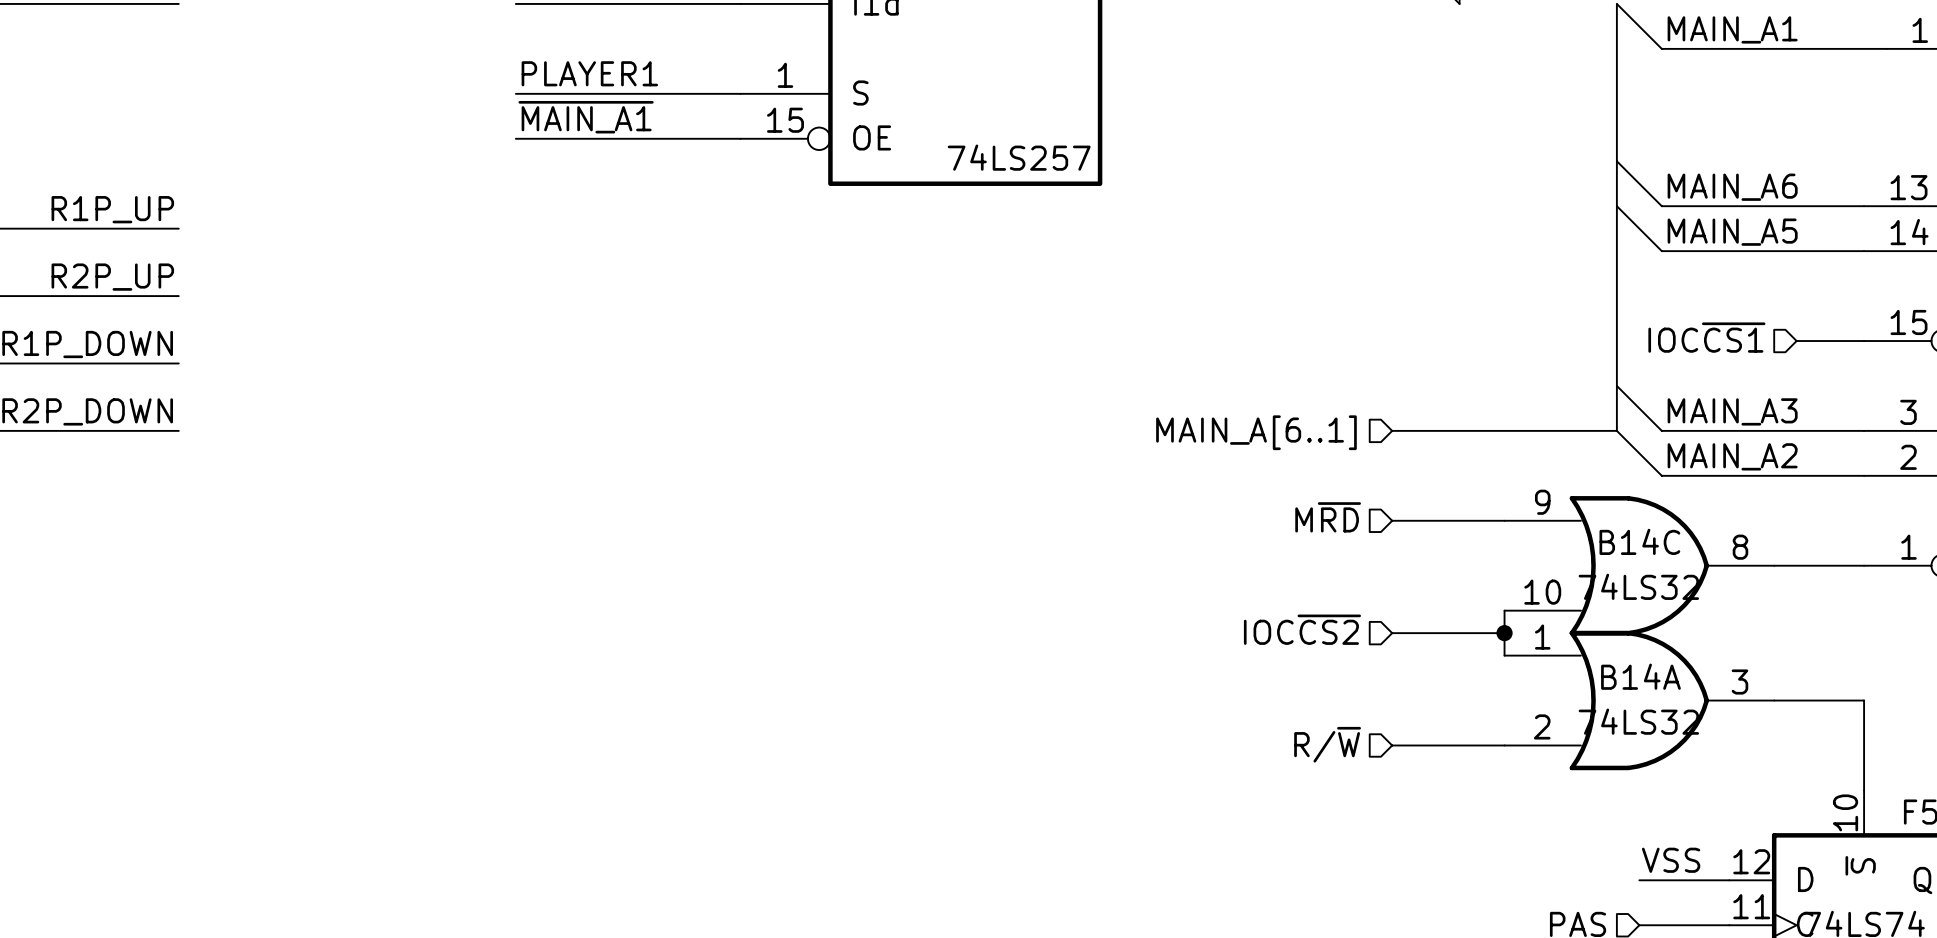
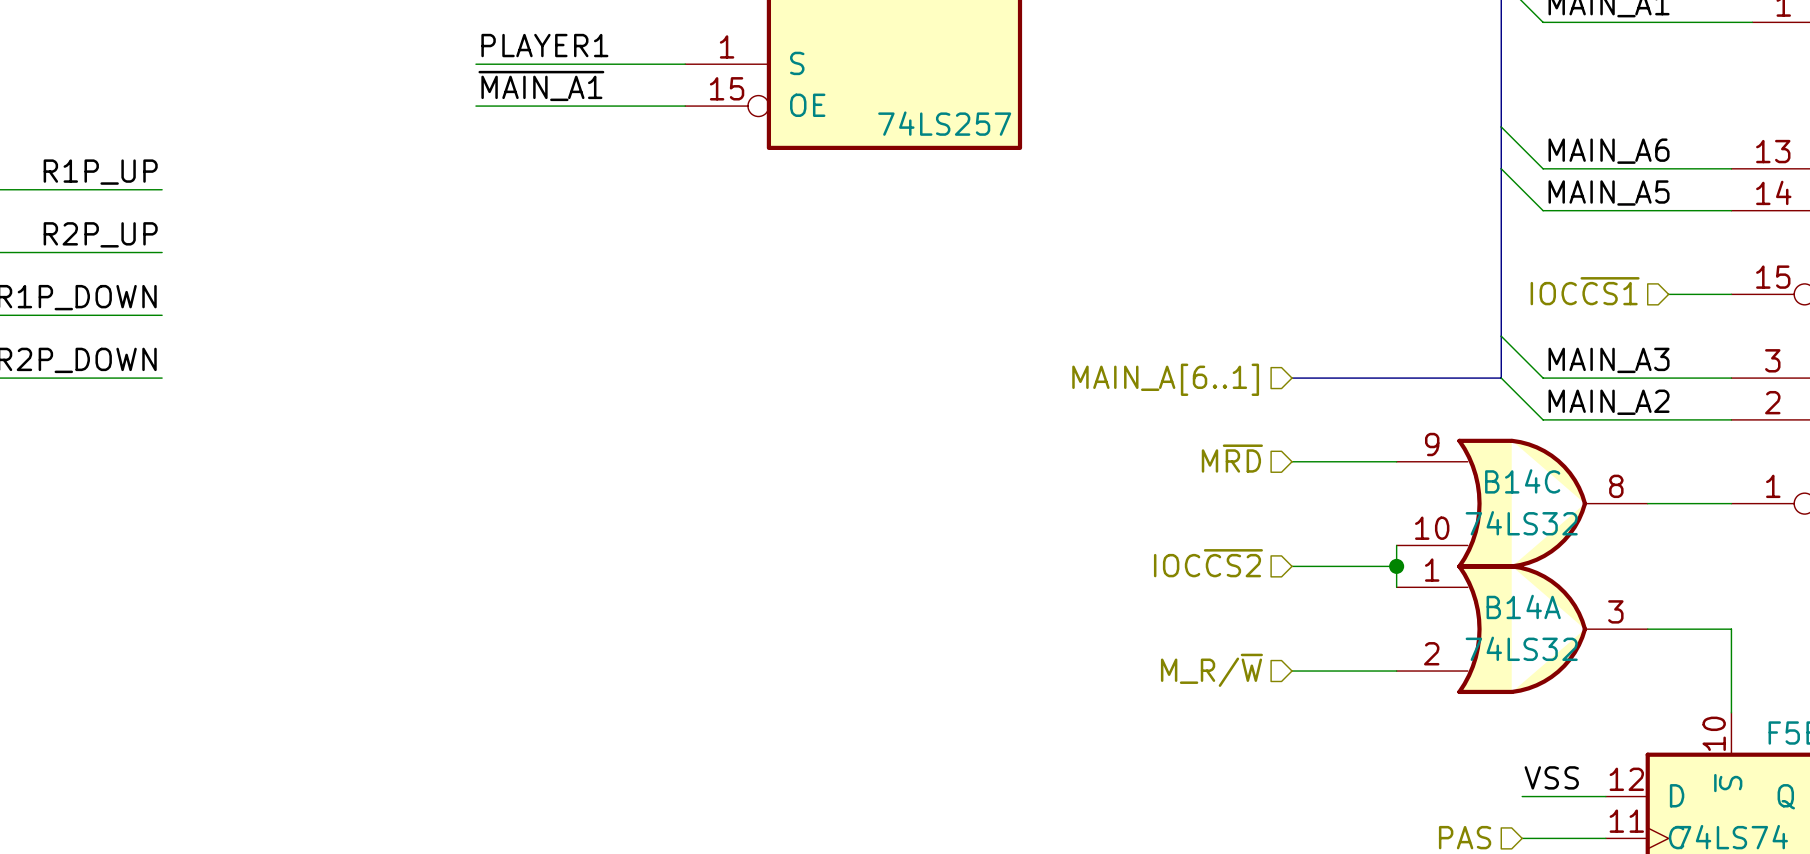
hierarchical label: R/~{W} (1327, 744) -> M_R/~{W} (1211, 670)

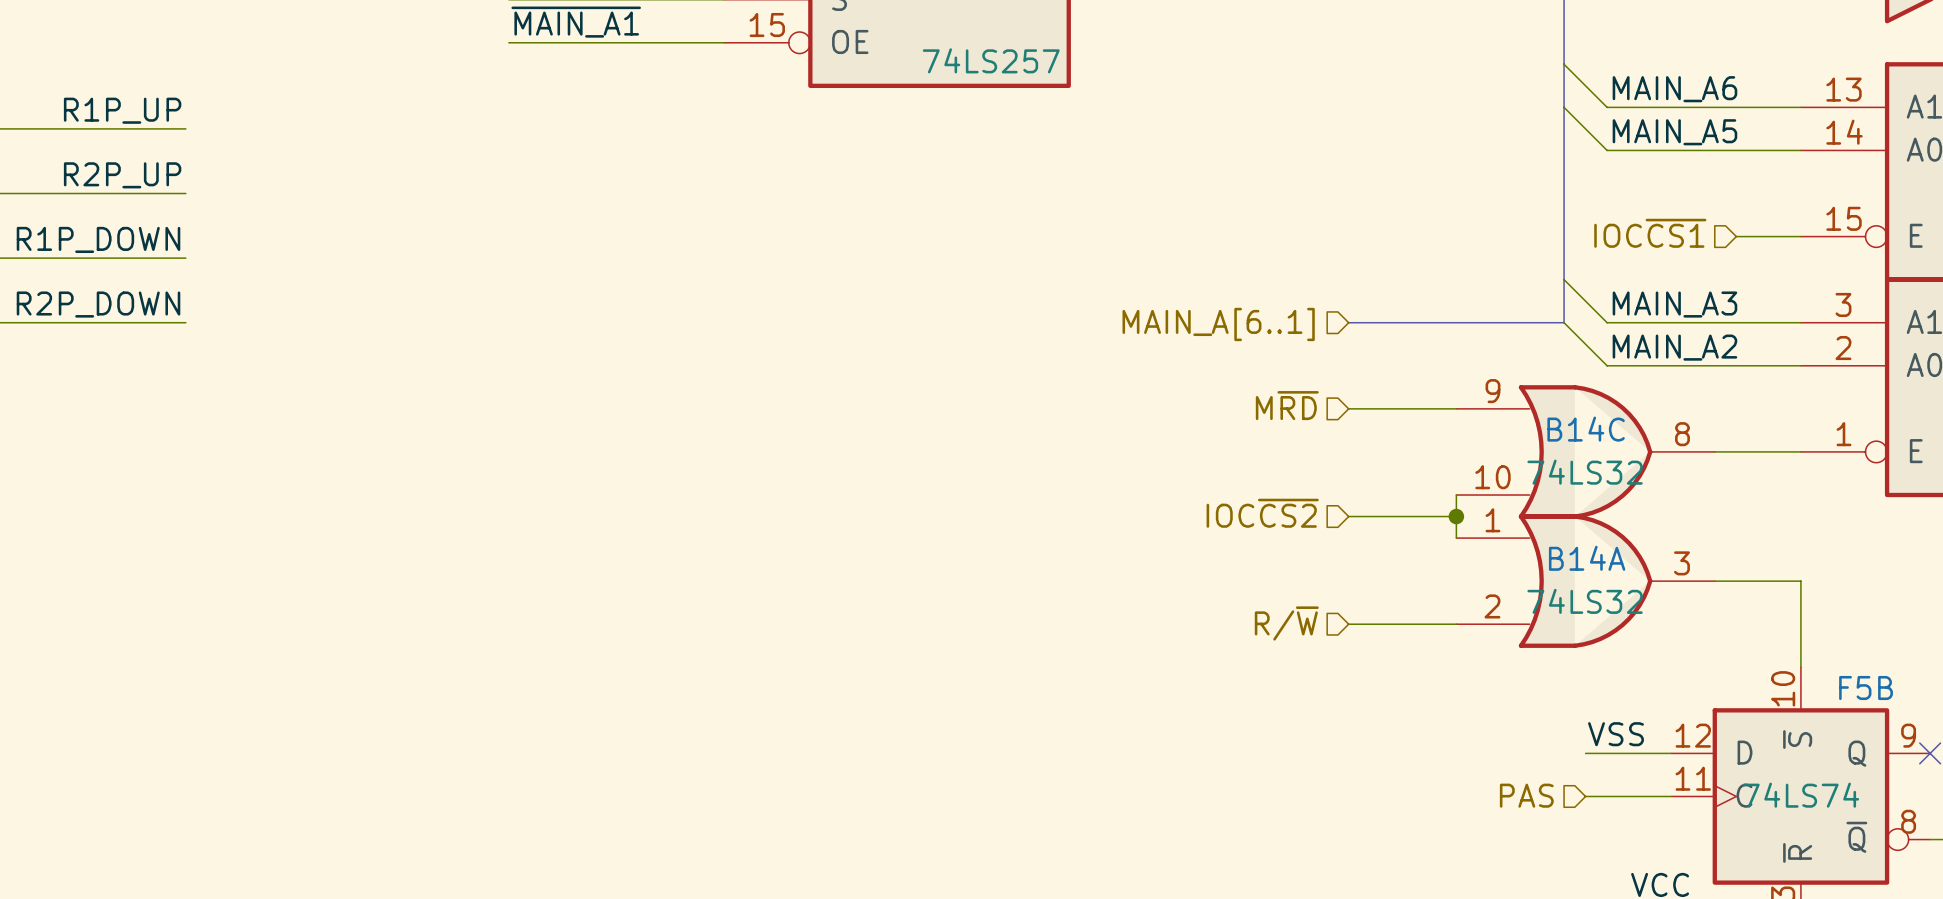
hierarchical label: M_R/~{W} (1211, 670) -> R/~{W} (1286, 623)

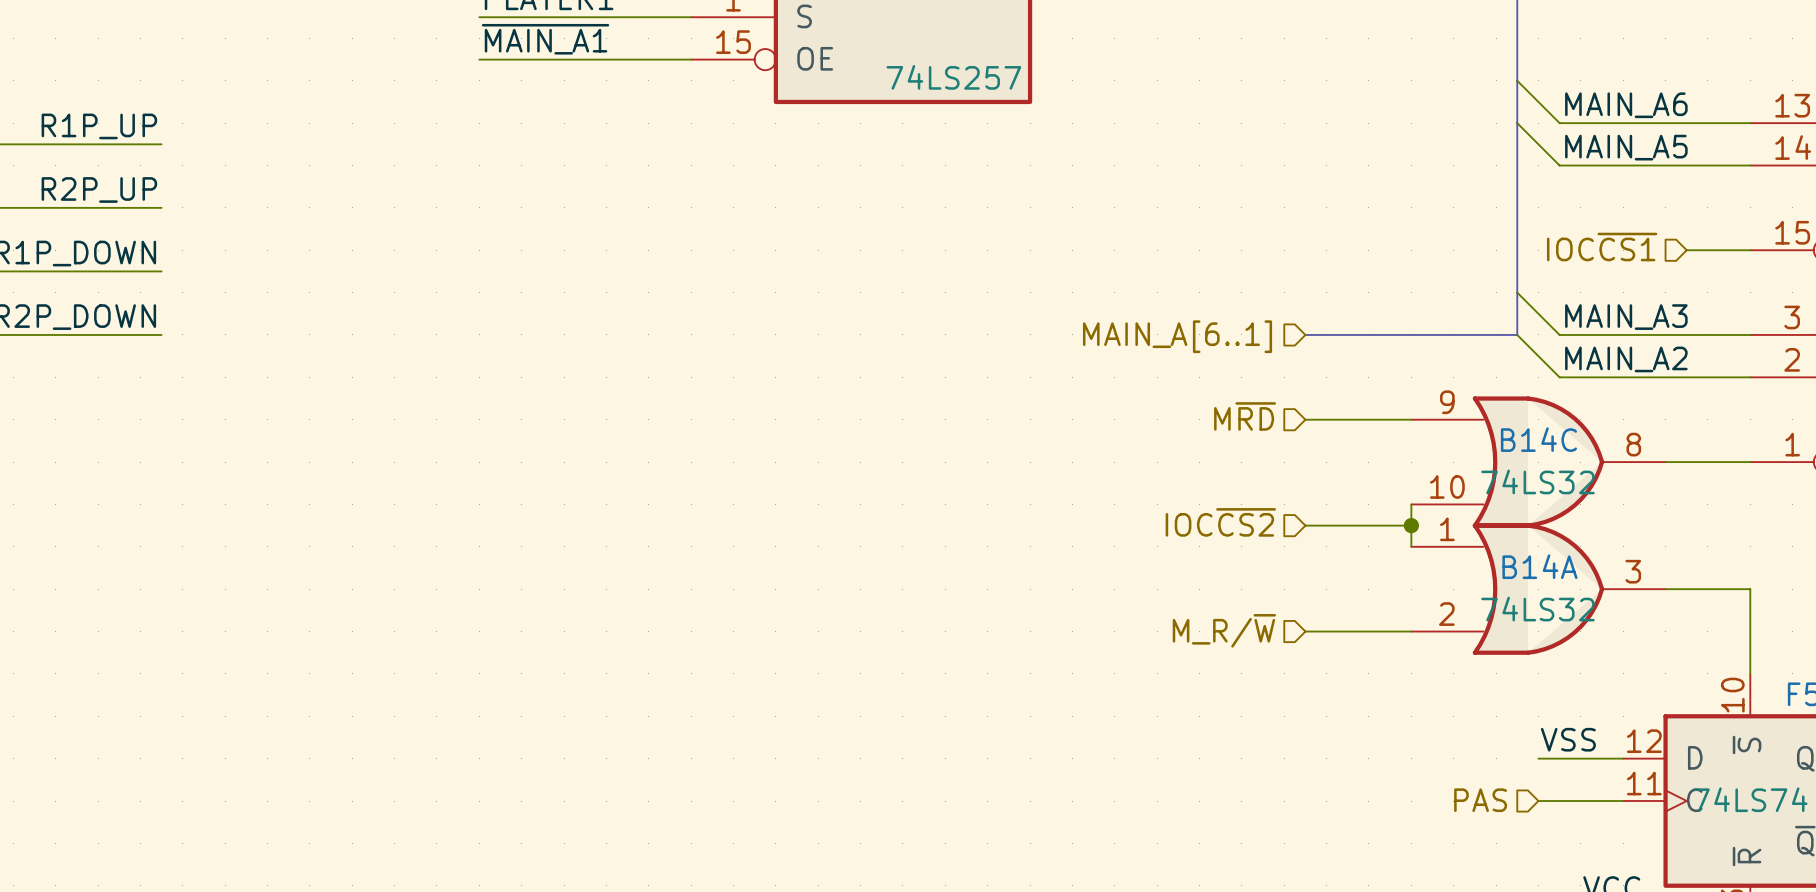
hierarchical label: R/~{W} (1286, 623) -> M_R/~{W} (1224, 630)

